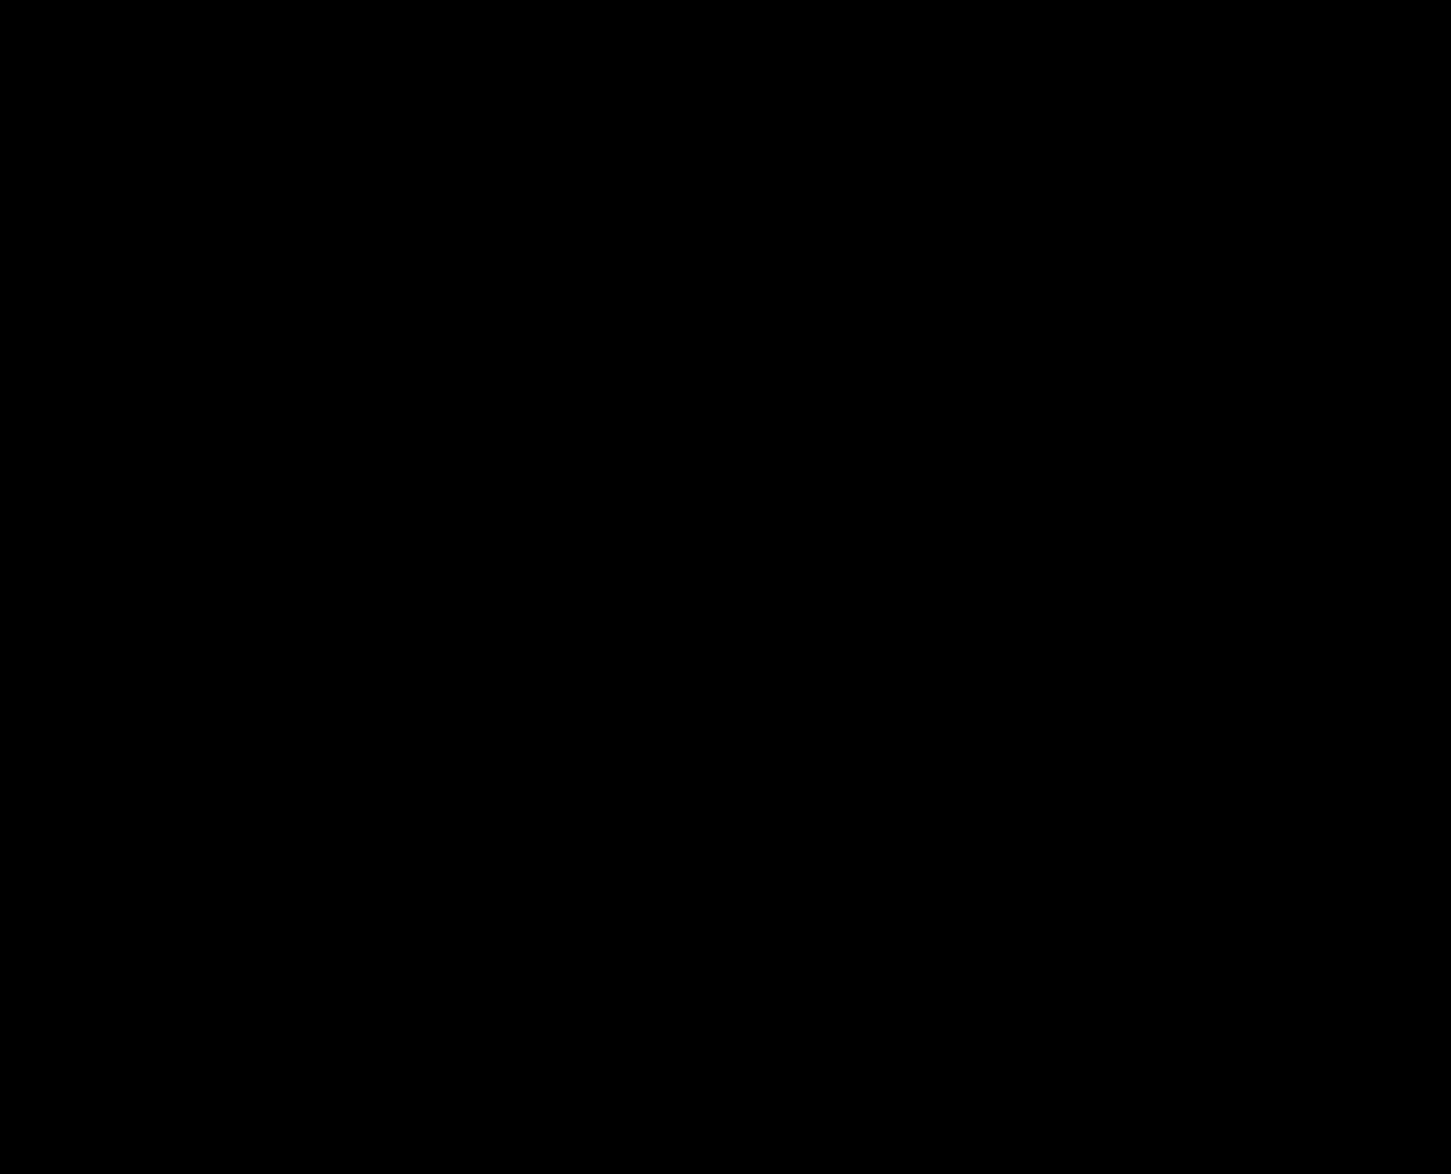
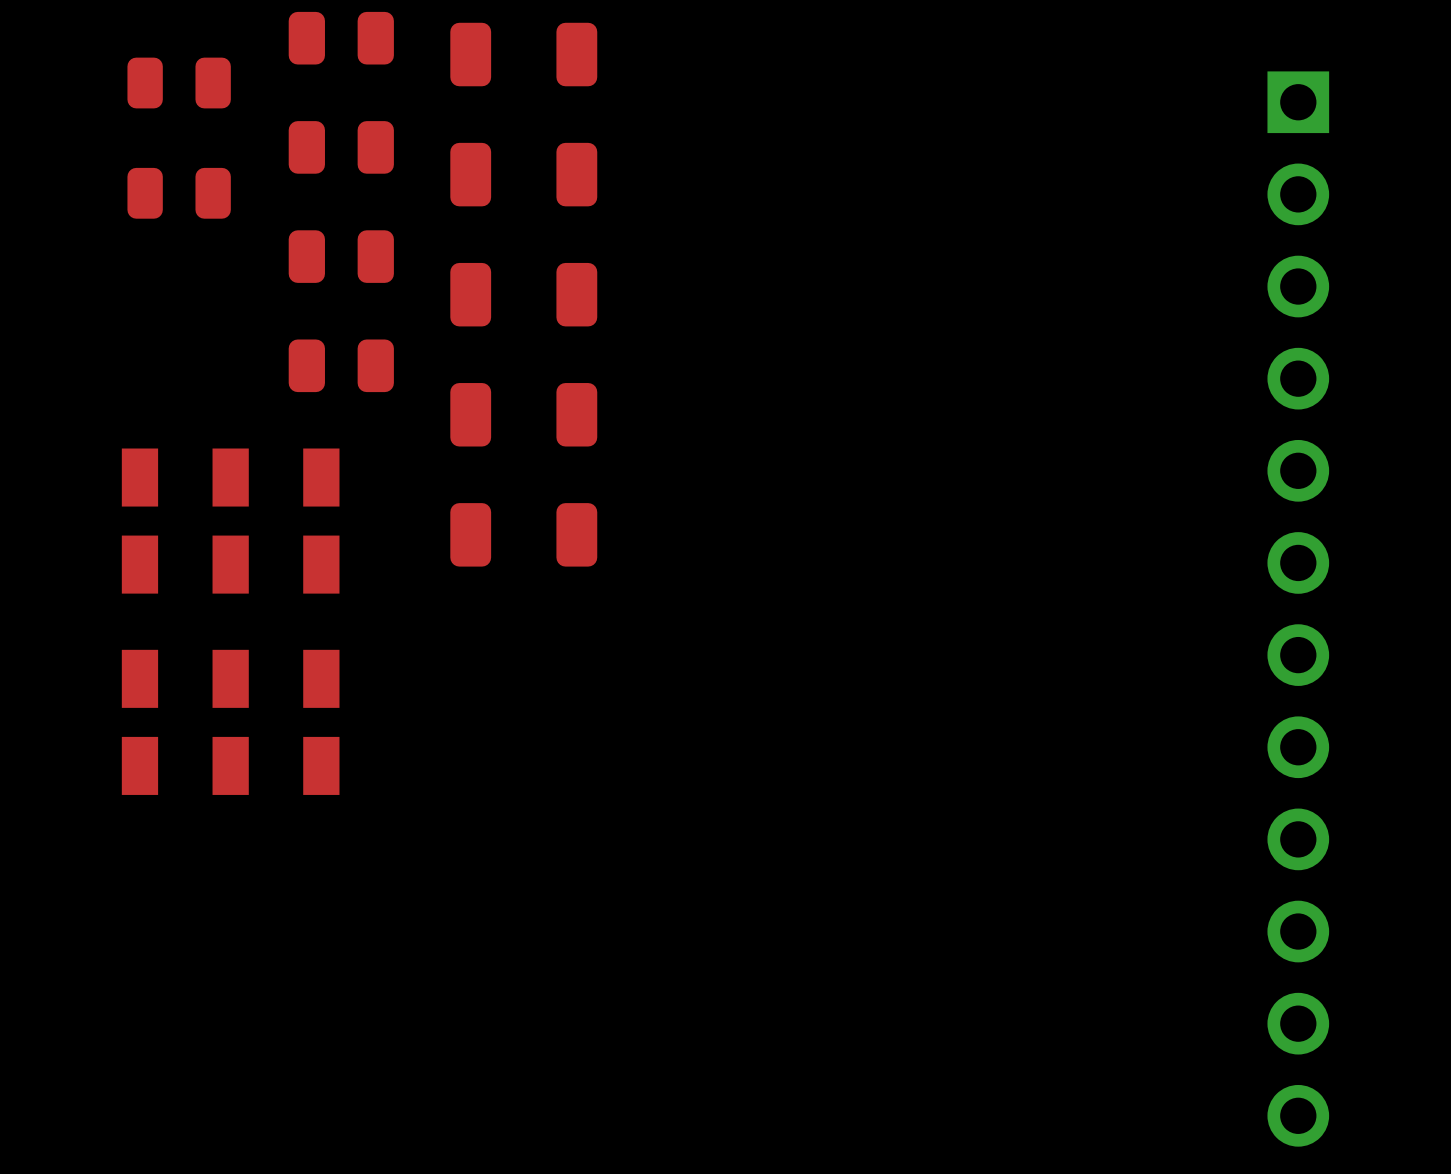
part: none -> (341, 38)
part: none -> (523, 54)
part: none -> (179, 83)
part: none -> (341, 147)
part: none -> (523, 174)
part: none -> (179, 193)
part: none -> (341, 256)
part: none -> (523, 294)
part: none -> (341, 365)
part: none -> (523, 414)
part: none -> (230, 521)
part: none -> (523, 534)
part: none -> (1298, 609)
part: none -> (230, 722)

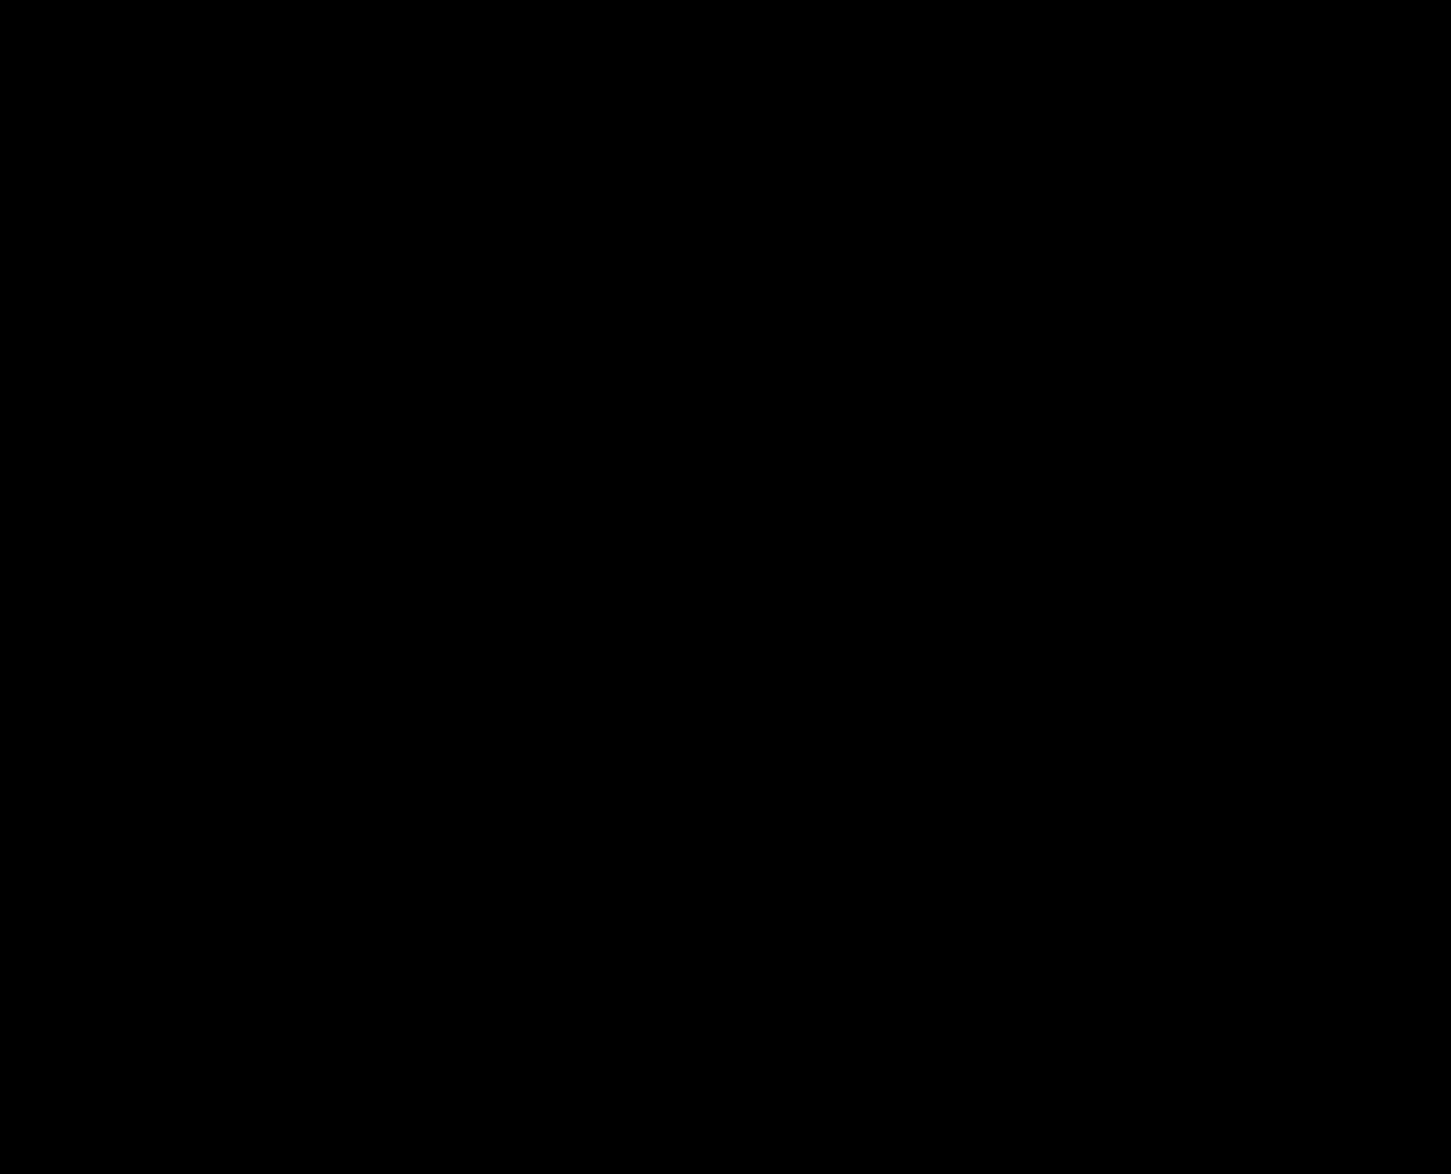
part: (341, 38) -> none
part: (523, 54) -> none
part: (179, 83) -> none
part: (341, 147) -> none
part: (523, 174) -> none
part: (179, 193) -> none
part: (341, 256) -> none
part: (523, 294) -> none
part: (341, 365) -> none
part: (523, 414) -> none
part: (230, 521) -> none
part: (523, 534) -> none
part: (1298, 609) -> none
part: (230, 722) -> none

